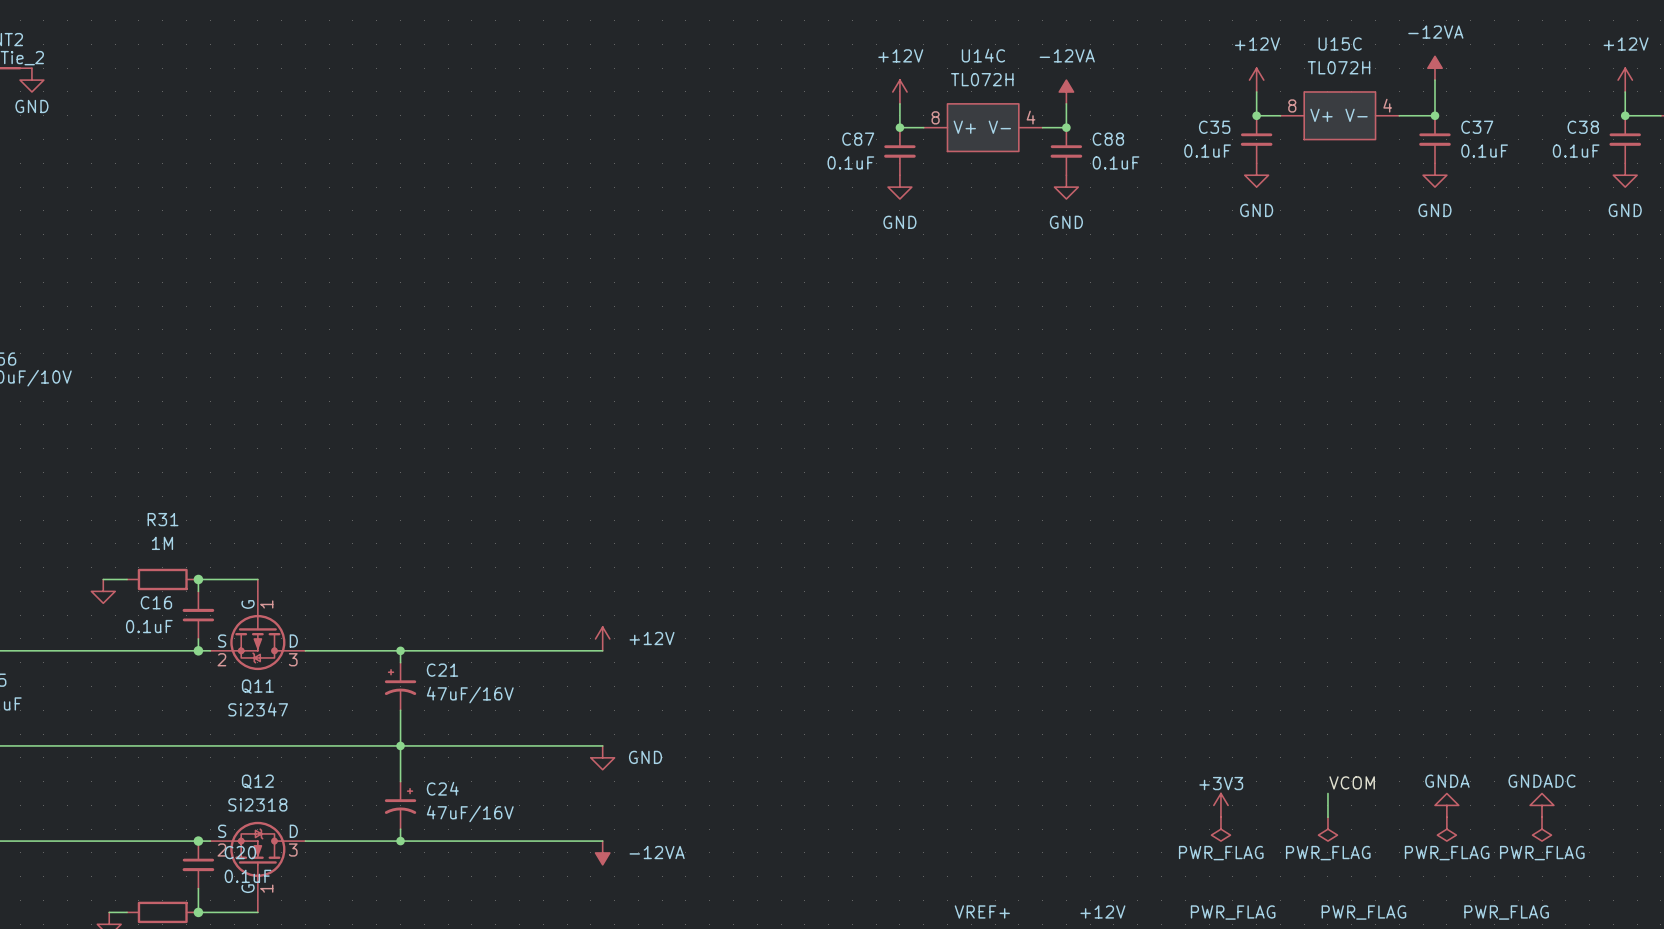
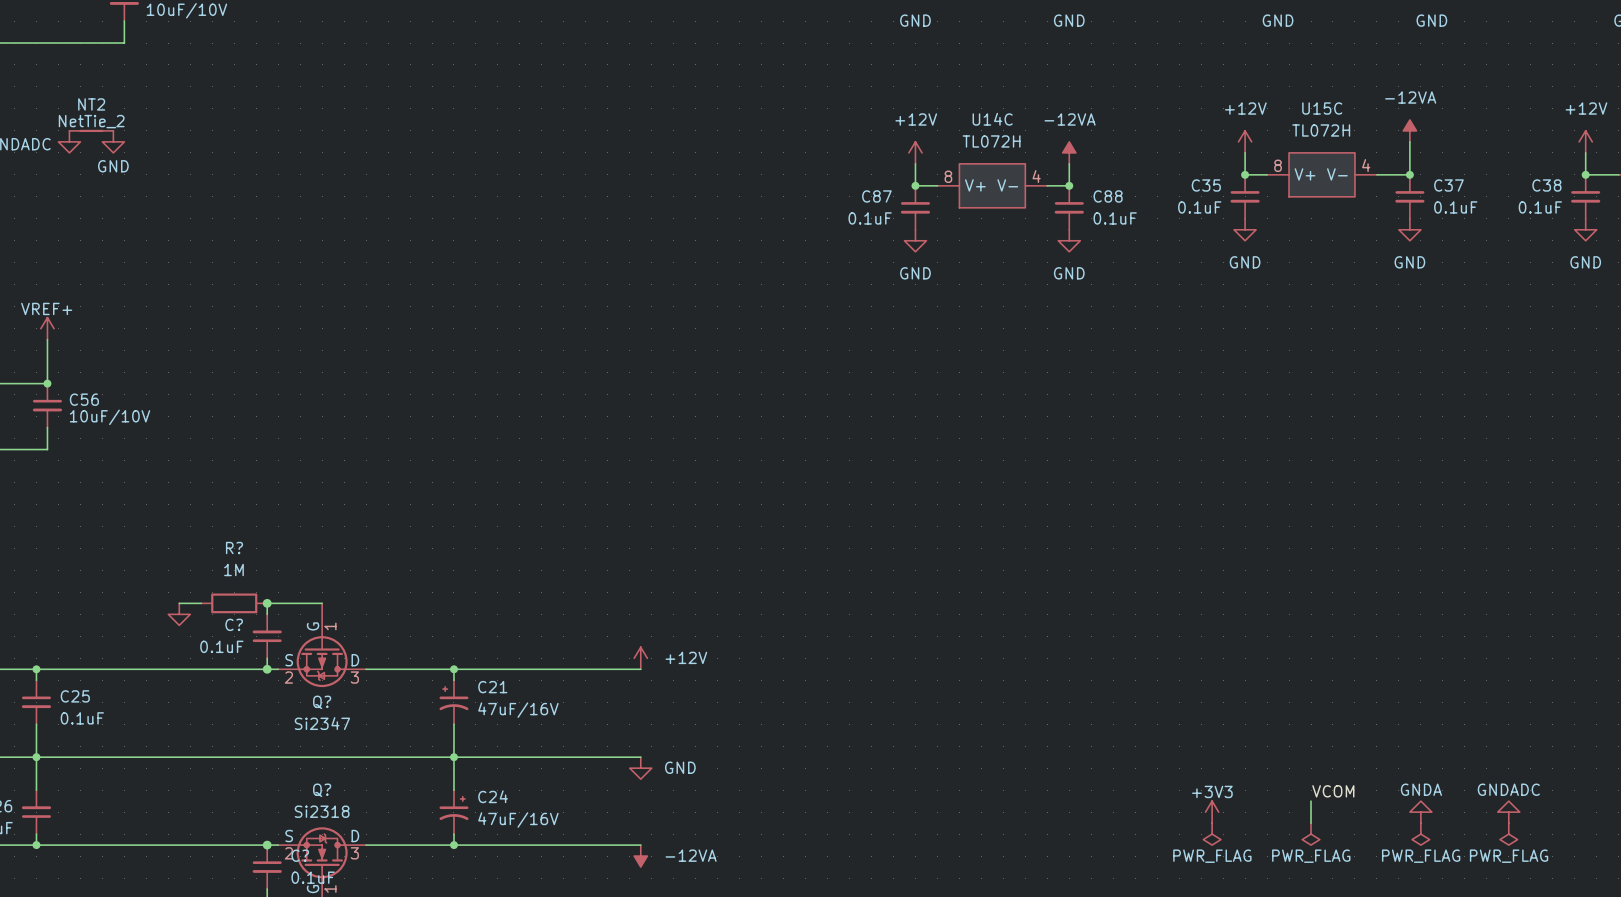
R31 name: R31 (163, 519) -> R? (234, 548)
C16 name: C16 (156, 602) -> C? (234, 624)
Q11 name: Q11 (257, 686) -> Q? (322, 702)
Q12 name: Q12 (257, 781) -> Q? (322, 790)
C20 name: C20 (240, 852) -> C? (300, 855)

